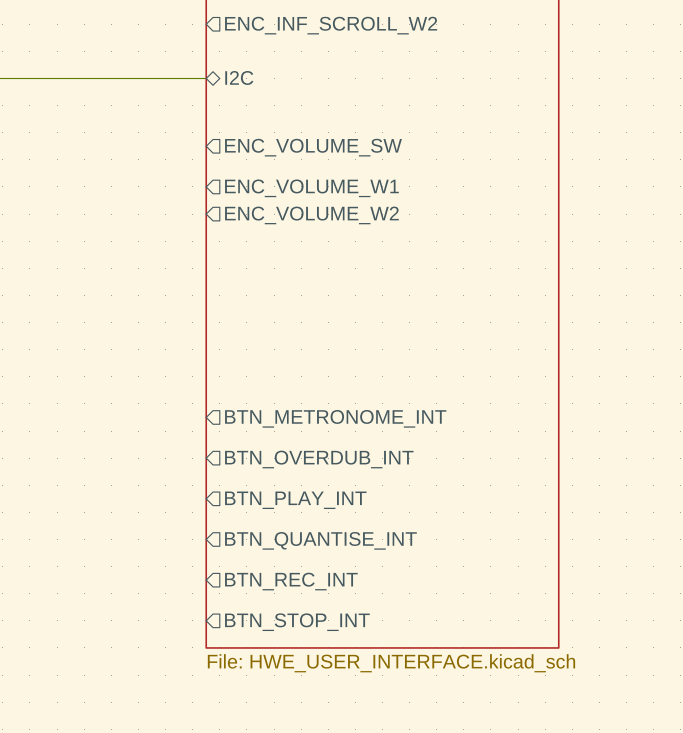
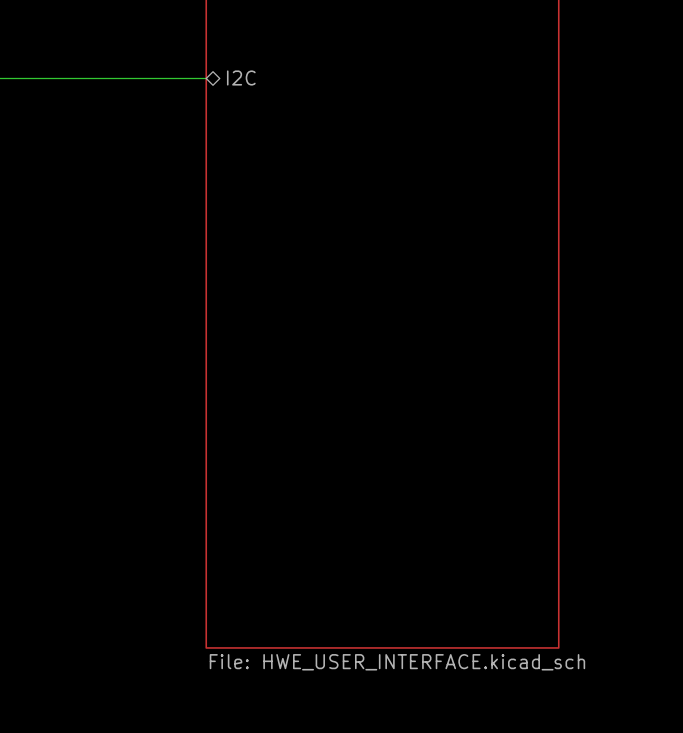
sheet pin: ENC_INF_SCROLL_W2 (331, 25) -> none
sheet pin: ENC_VOLUME_SW (313, 147) -> none
sheet pin: ENC_VOLUME_W1 (311, 188) -> none
sheet pin: ENC_VOLUME_W2 (311, 215) -> none
sheet pin: BTN_METRONOME_INT (335, 418) -> none
sheet pin: BTN_OVERDUB_INT (319, 459) -> none
sheet pin: BTN_PLAY_INT (295, 500) -> none
sheet pin: BTN_QUANTISE_INT (320, 540) -> none
sheet pin: BTN_REC_INT (291, 581) -> none
sheet pin: BTN_STOP_INT (297, 622) -> none

